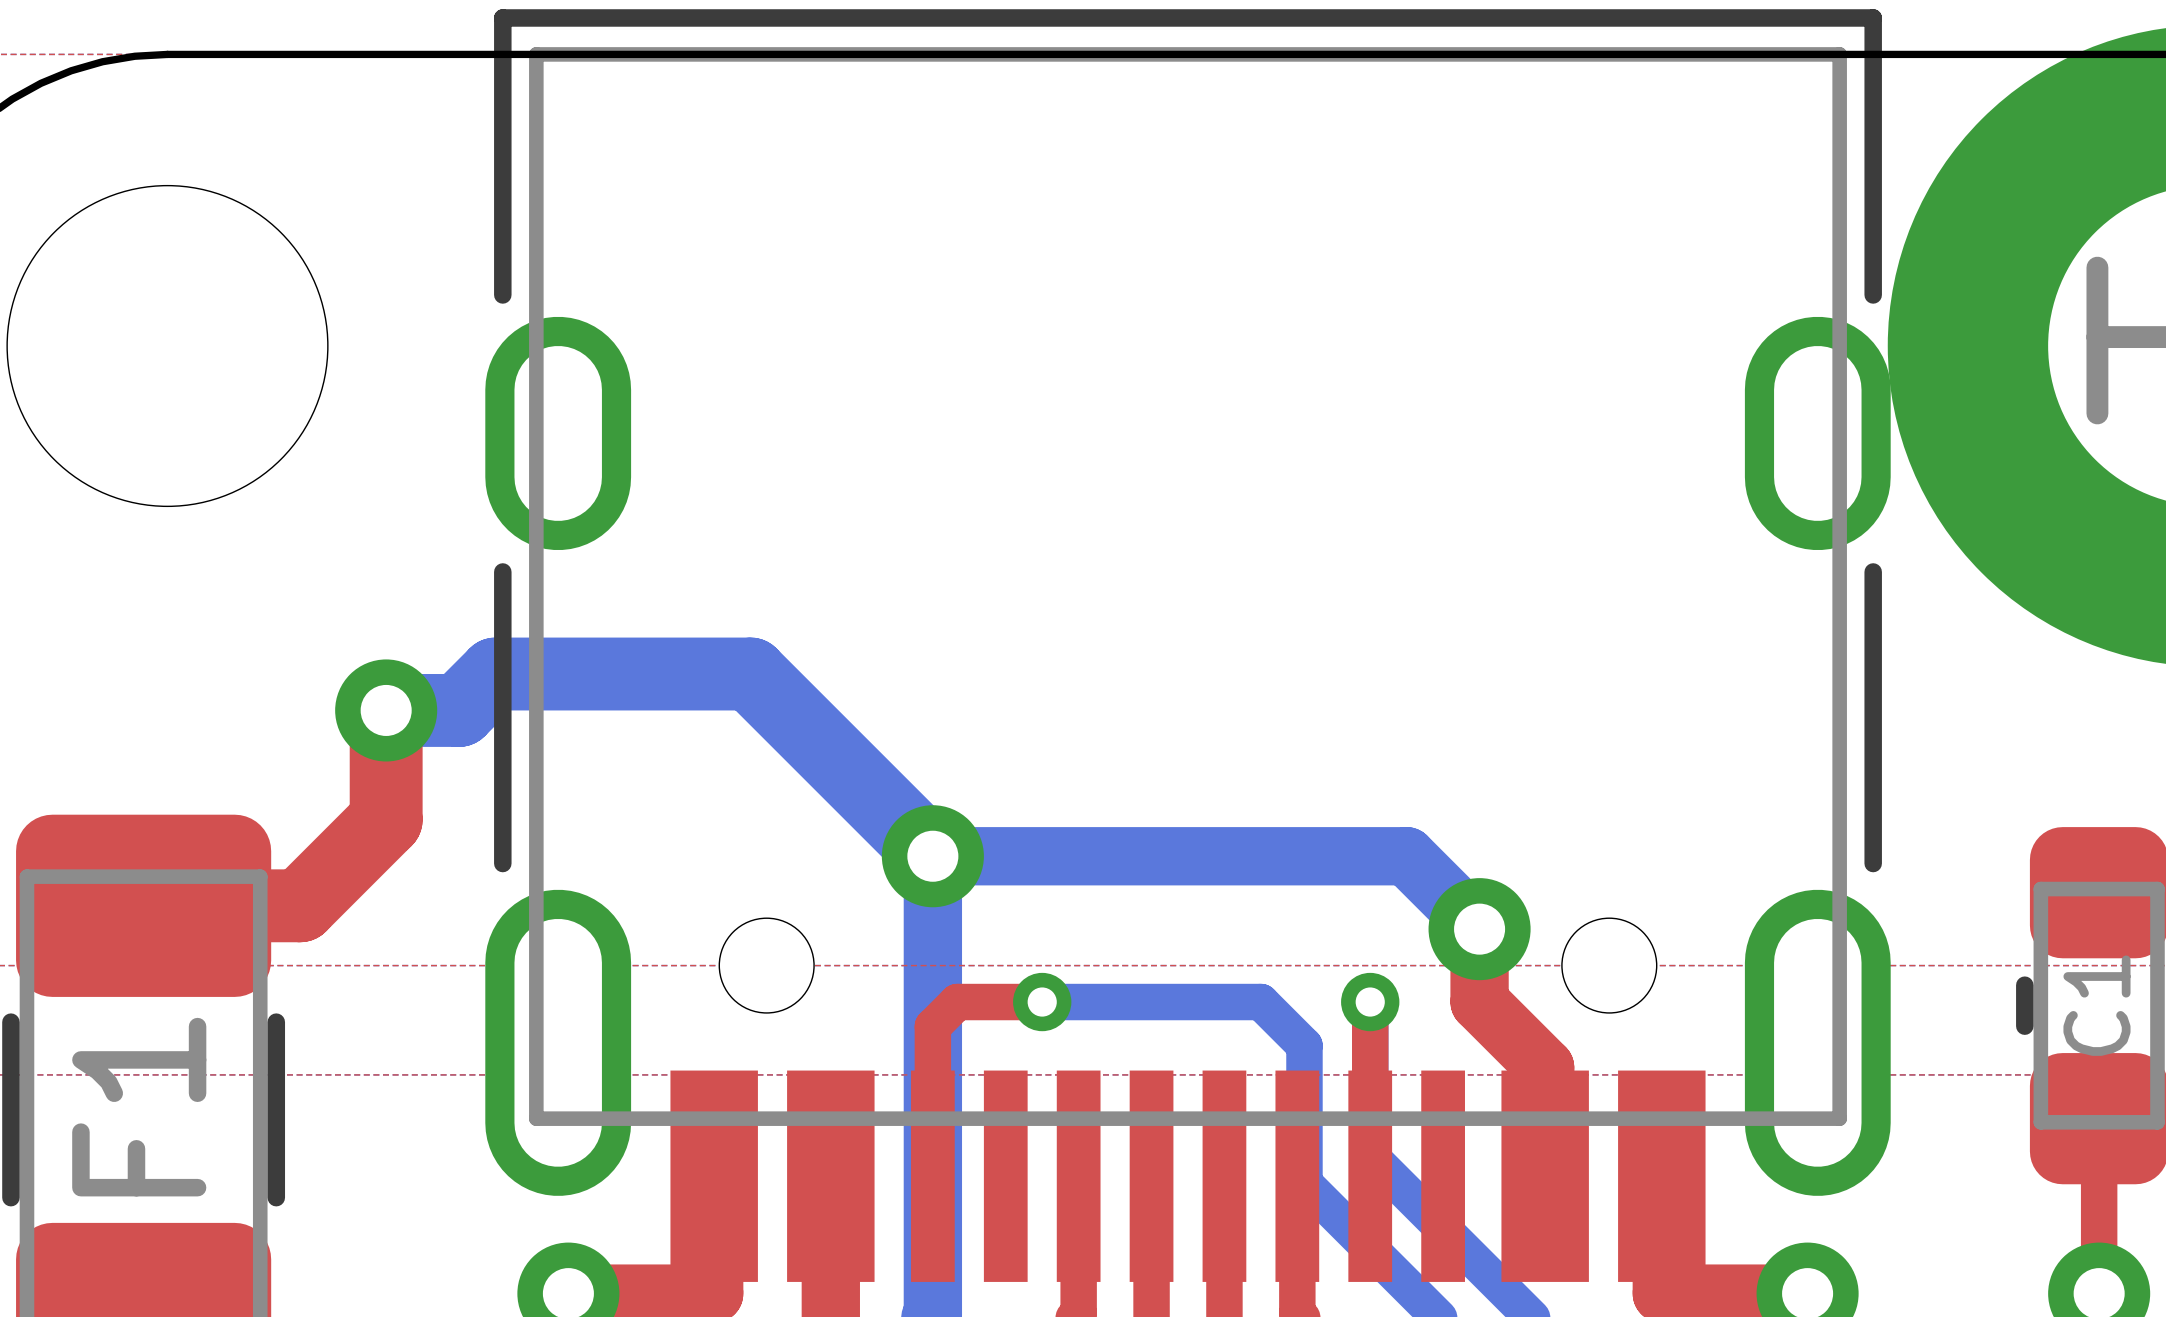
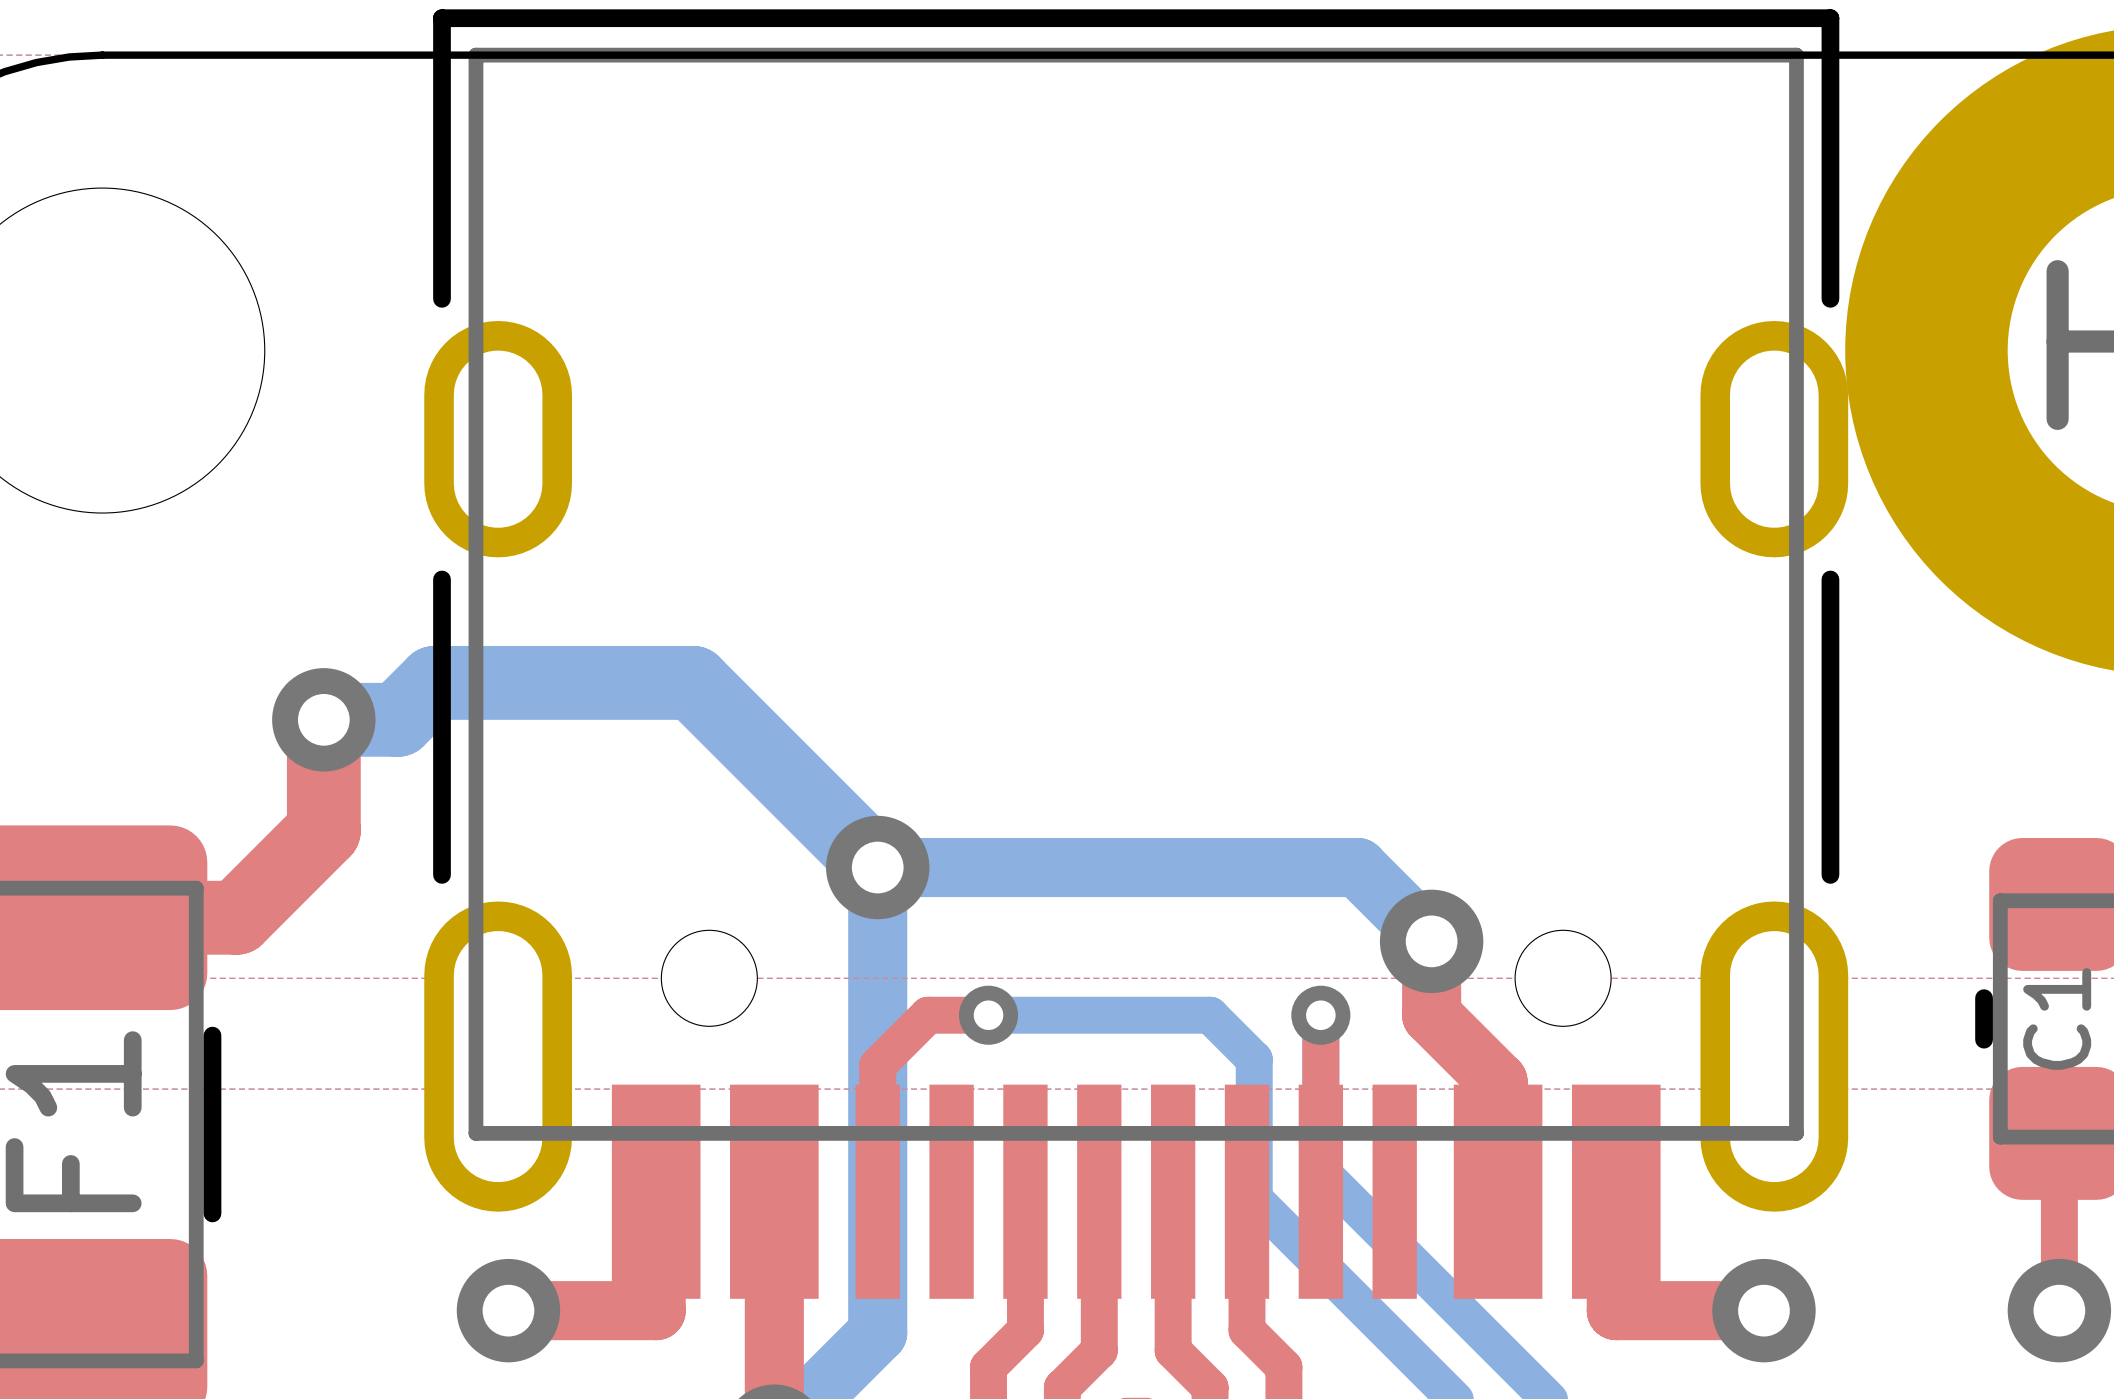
top track: (982, 1002) (957, 1002) (932, 1026) (932, 1051) -> (928, 1015) (877, 1065)

